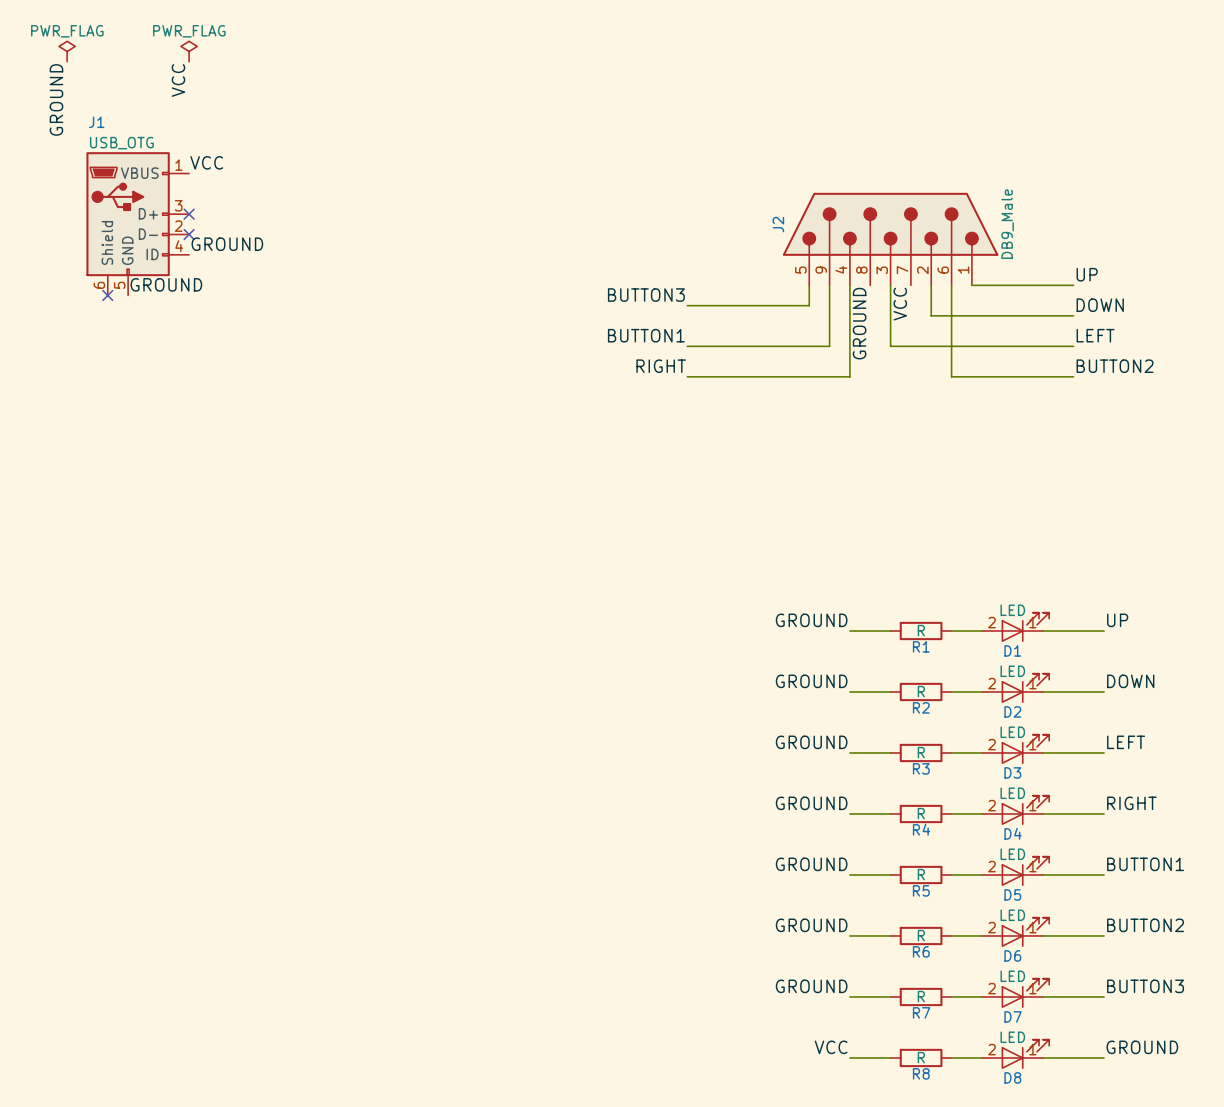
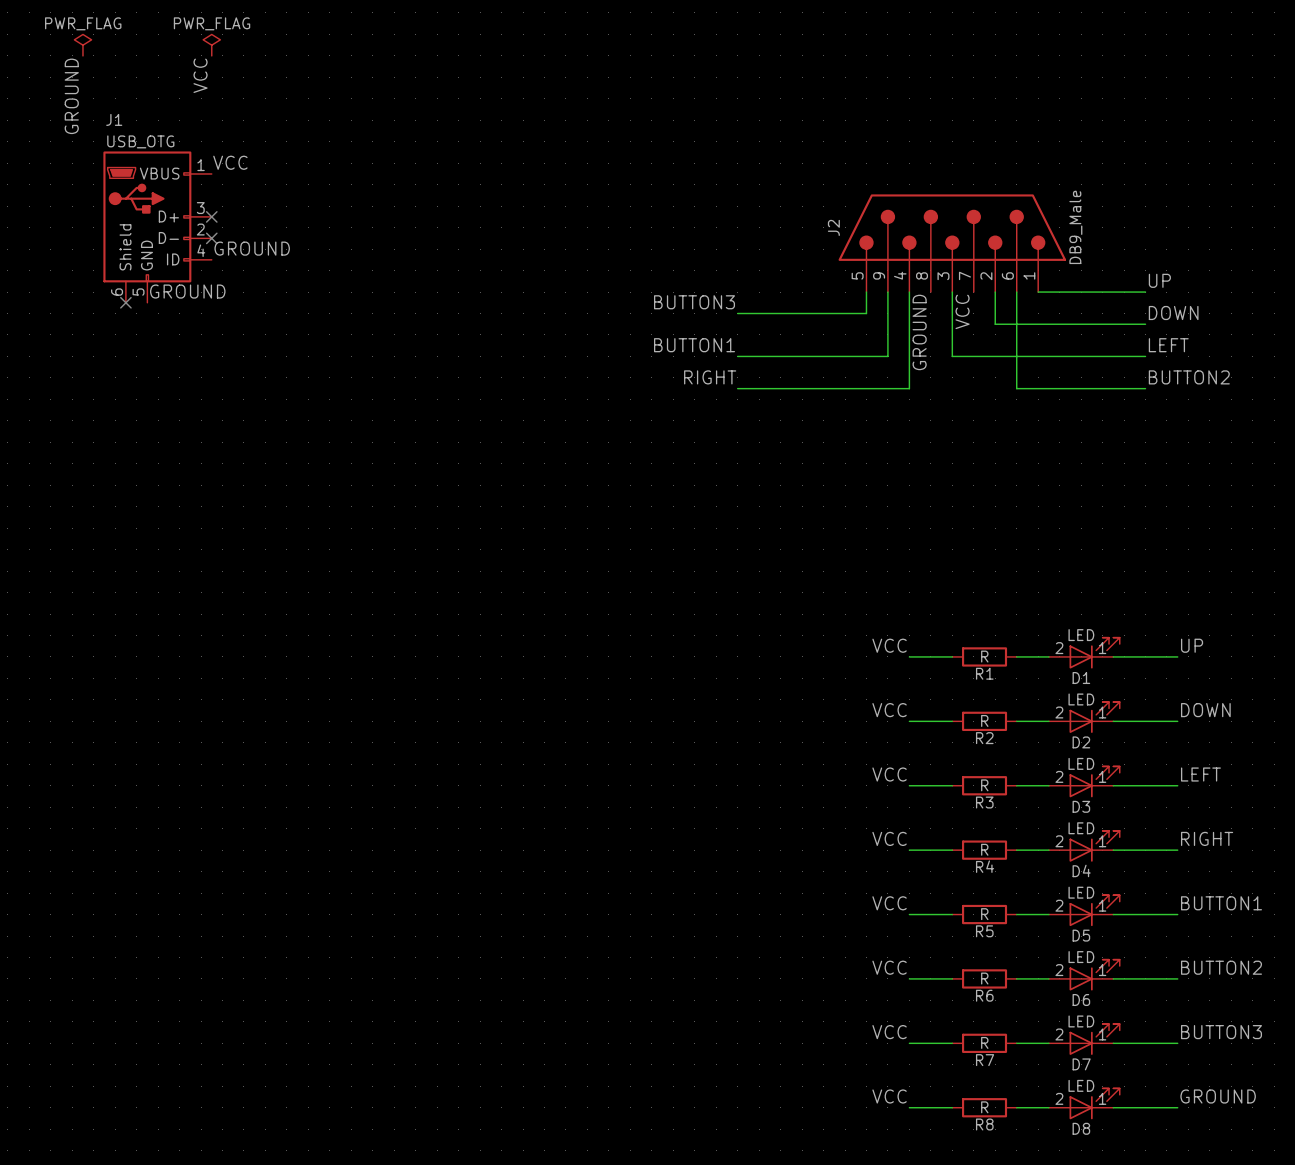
label: GROUND (811, 620) -> VCC (889, 645)
label: GROUND (811, 681) -> VCC (889, 710)
label: GROUND (811, 742) -> VCC (889, 774)
label: GROUND (811, 803) -> VCC (889, 838)
label: GROUND (811, 864) -> VCC (889, 903)
label: GROUND (811, 925) -> VCC (889, 967)
label: GROUND (811, 986) -> VCC (889, 1032)

